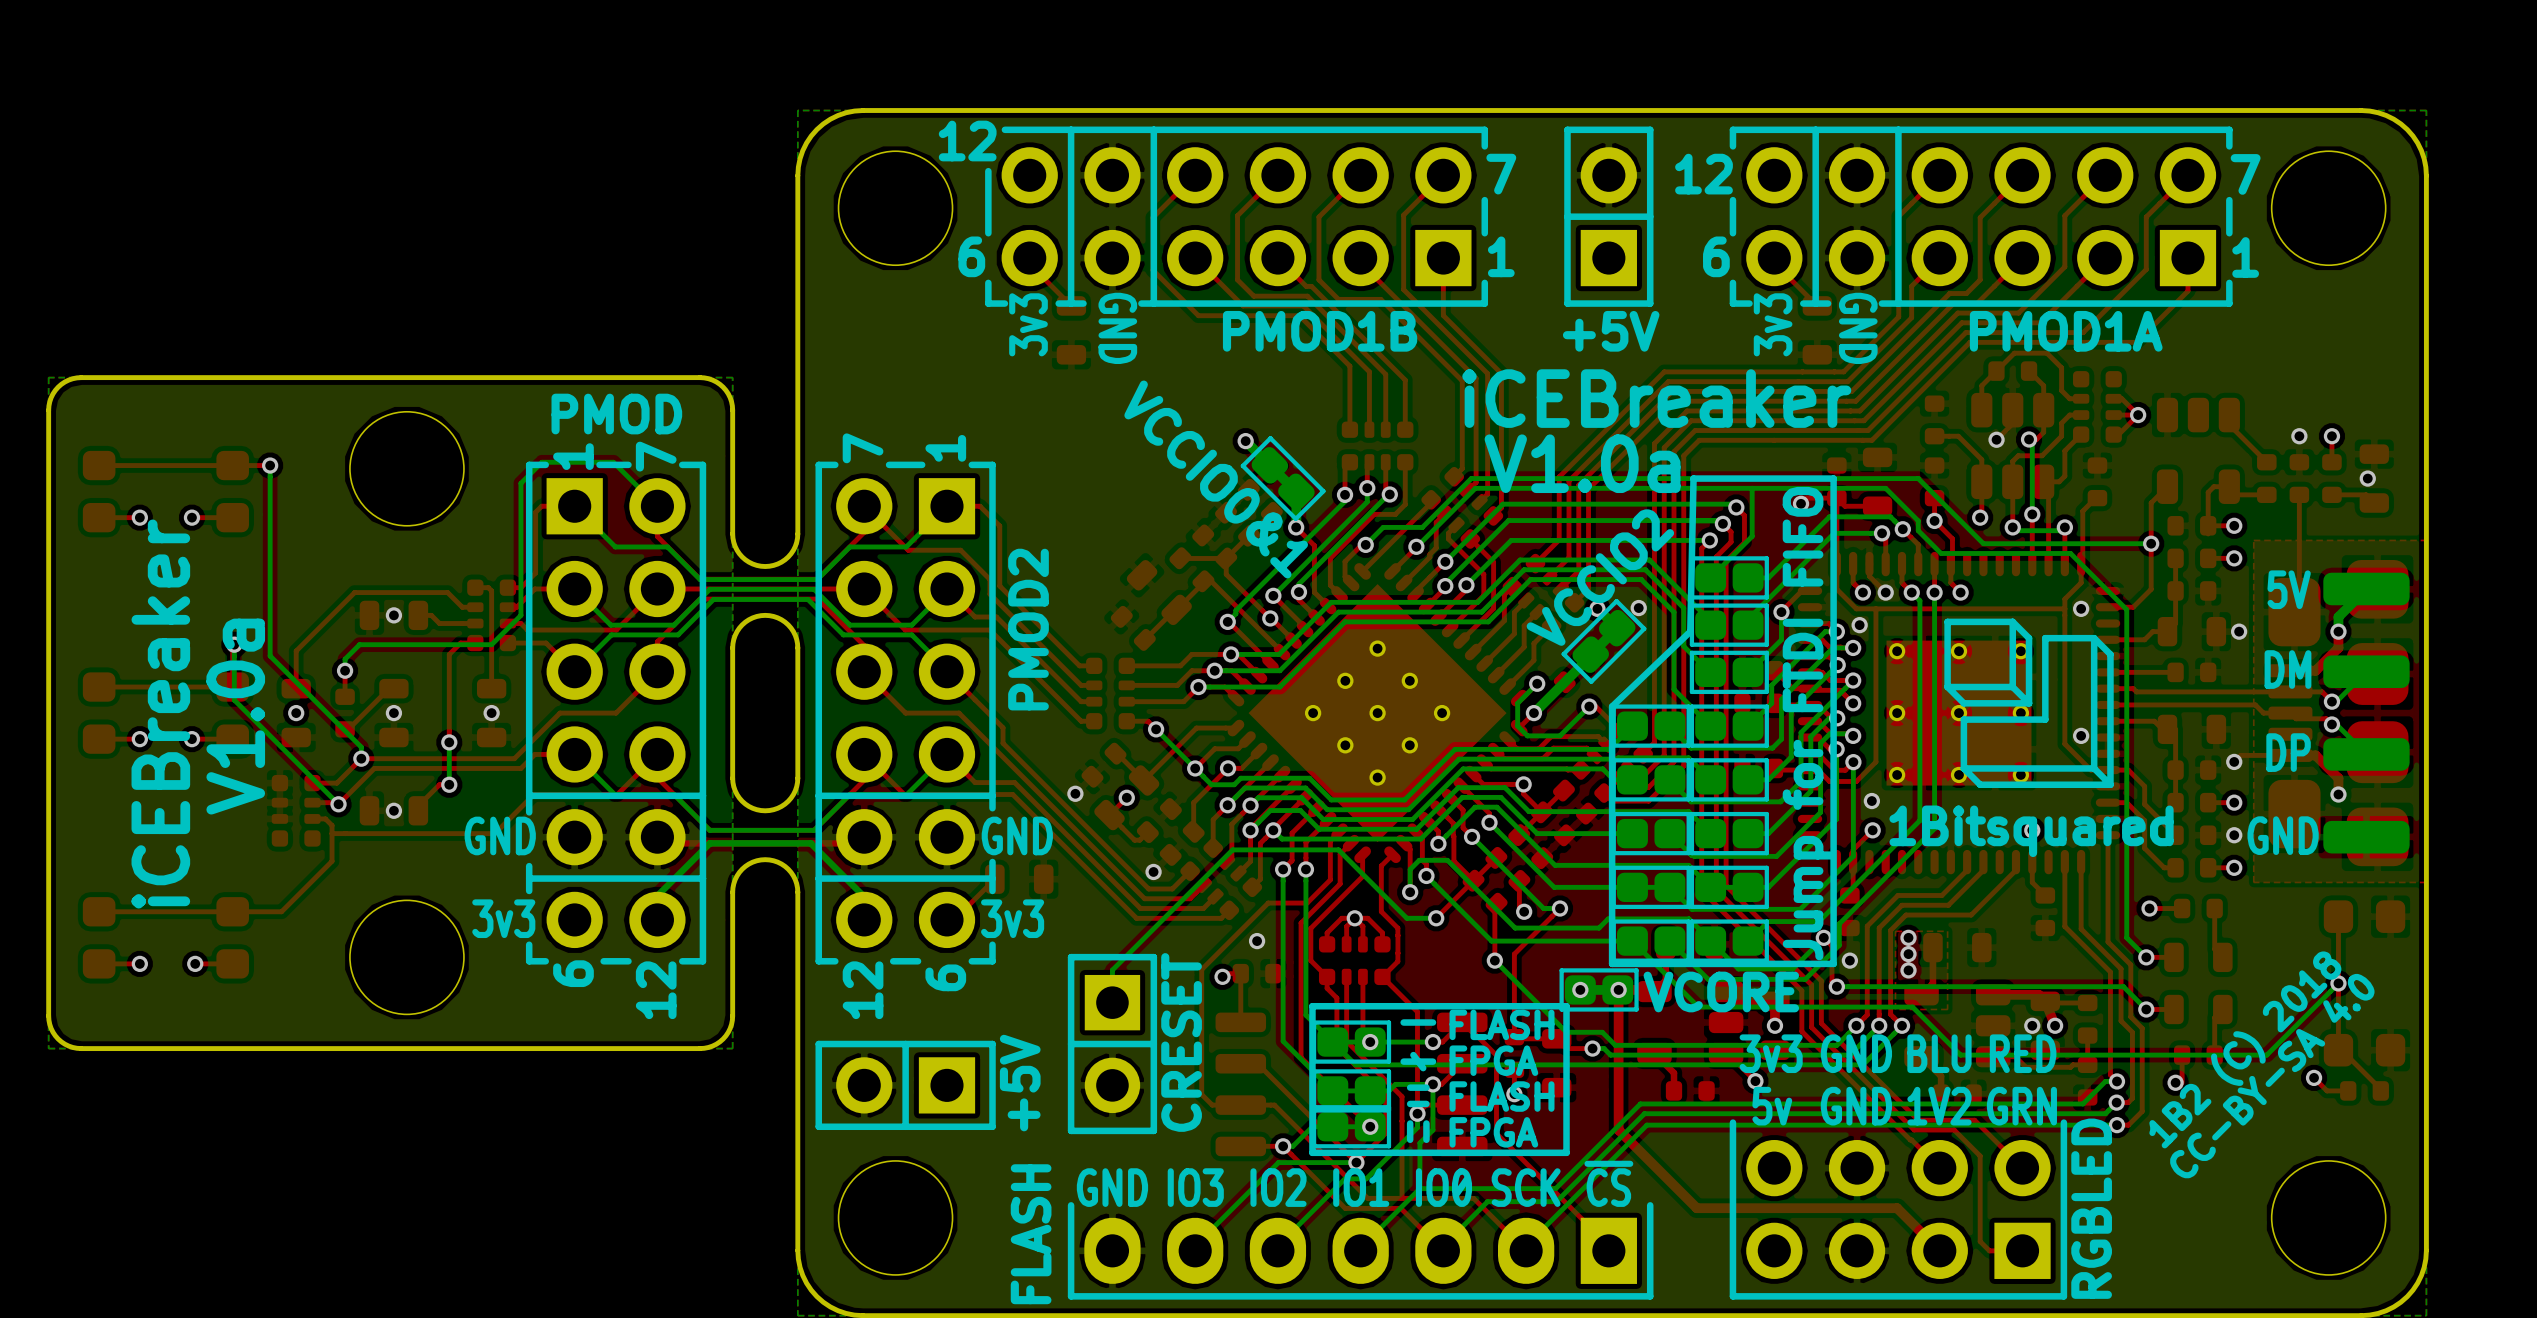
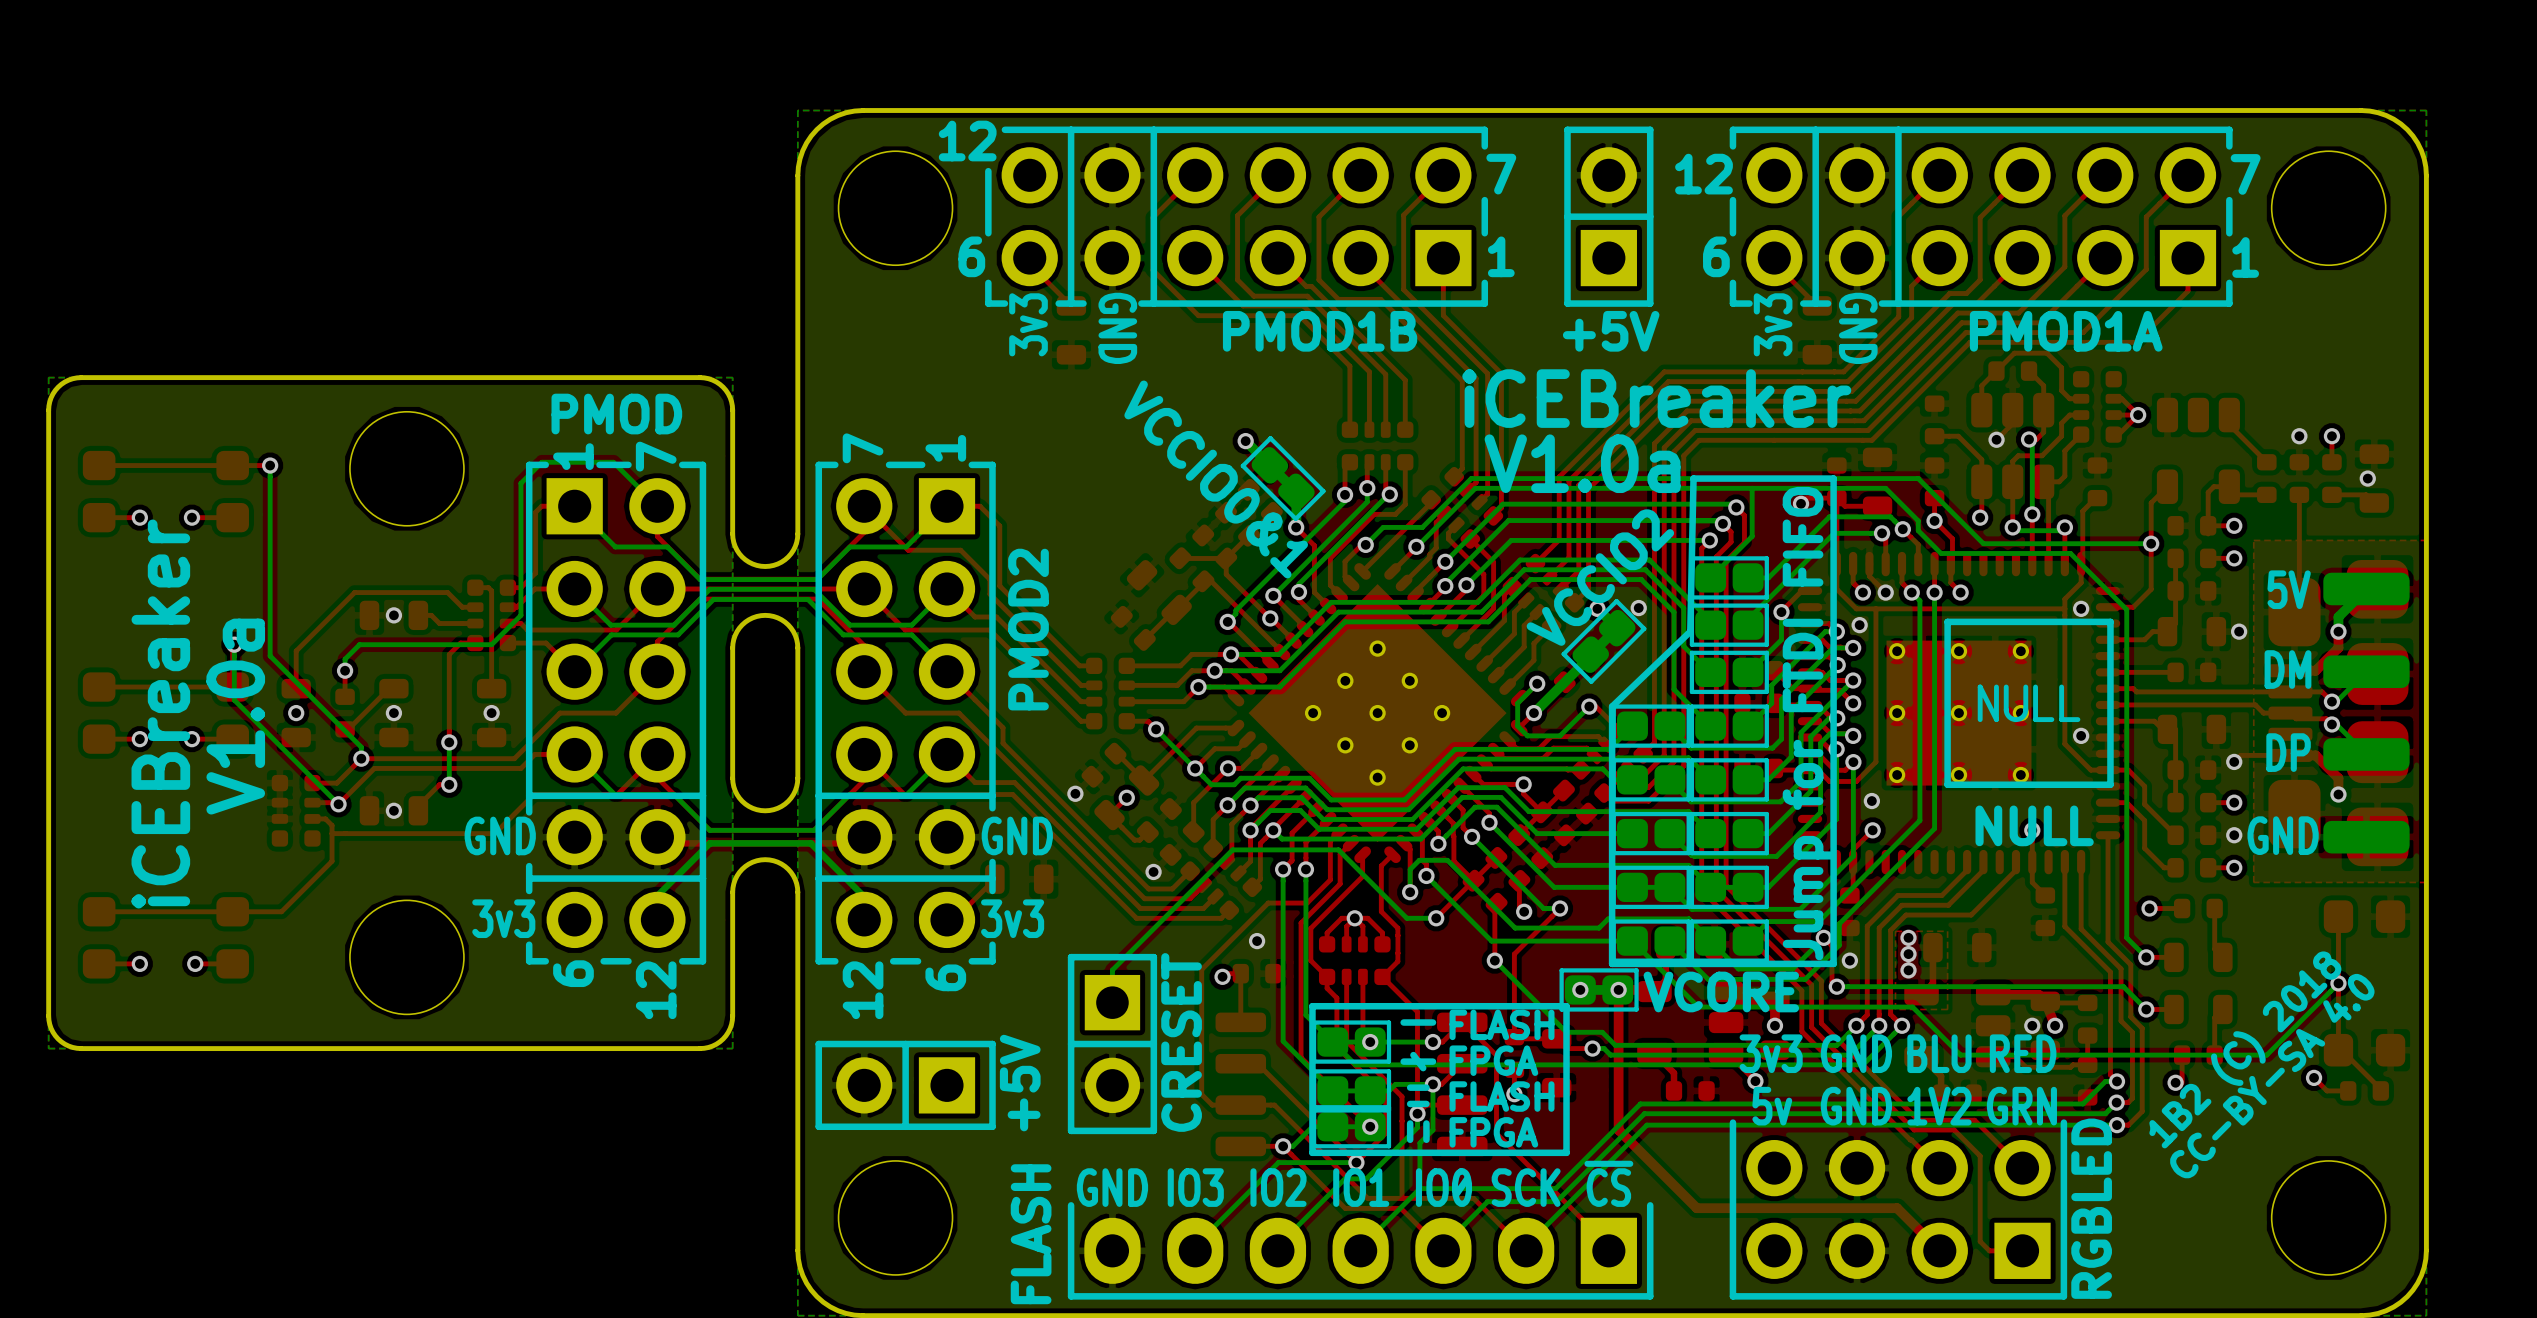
drawing shape: [1944, 618, 2114, 789] -> [1944, 618, 2114, 789]
text: 1Bitsquared (2031, 831) -> NULL (2034, 825)

